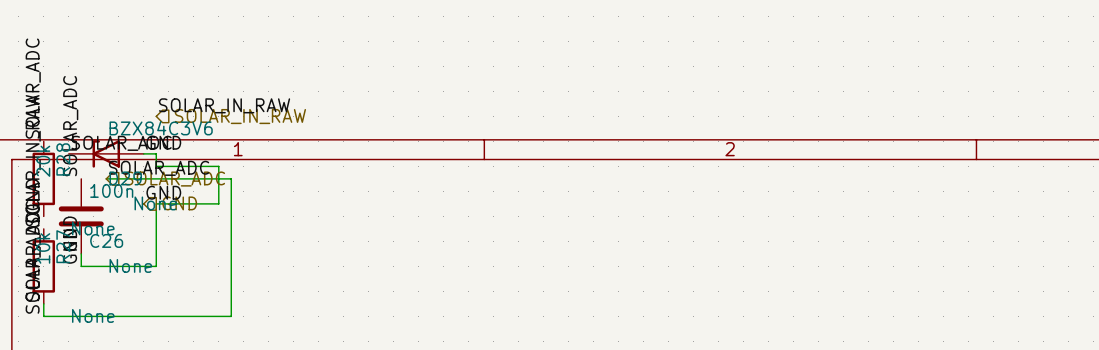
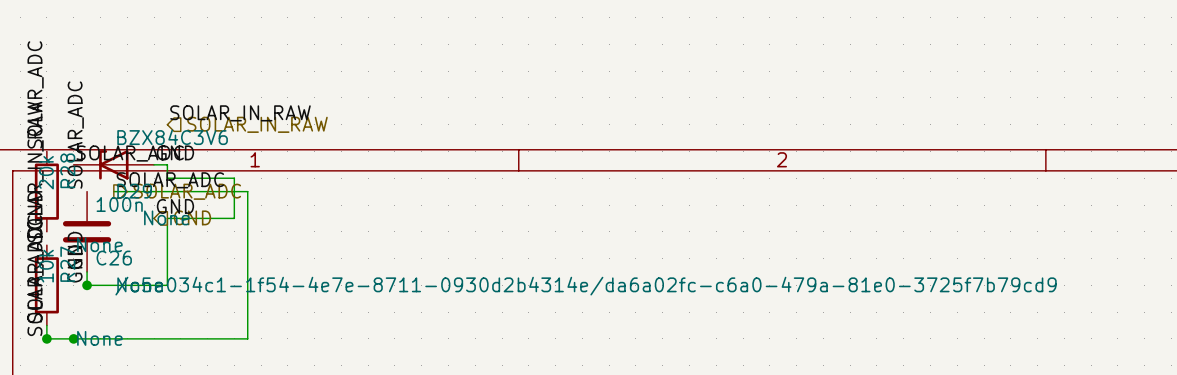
hierarchical label shape: input (174, 179) -> output (187, 191)
junction: none -> (87, 285)
C26 text: none -> /c5a034c1-1f54-4e7e-8711-0930d2b4314e/da6a02fc-c6a0-479a-81e0-3725f7b79cd9 (586, 286)
junction: none -> (46, 338)
junction: none -> (73, 338)

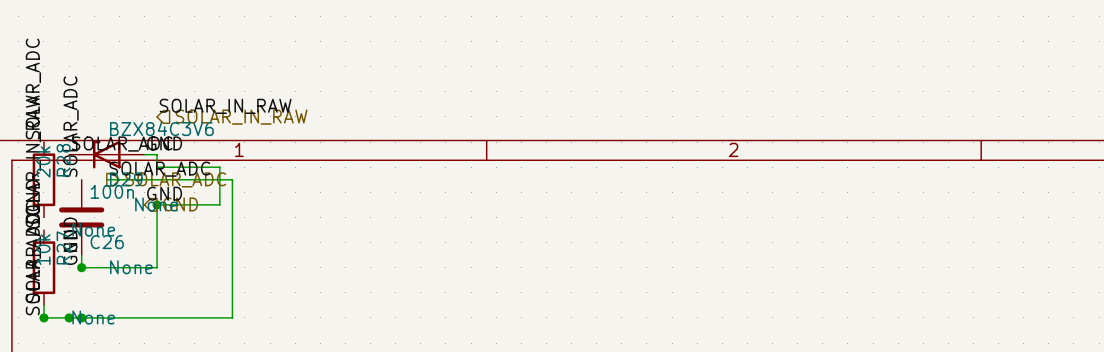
junction: none -> (157, 204)
C26 text: /c5a034c1-1f54-4e7e-8711-0930d2b4314e/da6a02fc-c6a0-479a-81e0-3725f7b79cd9 (586, 286) -> none
junction: none -> (81, 317)

